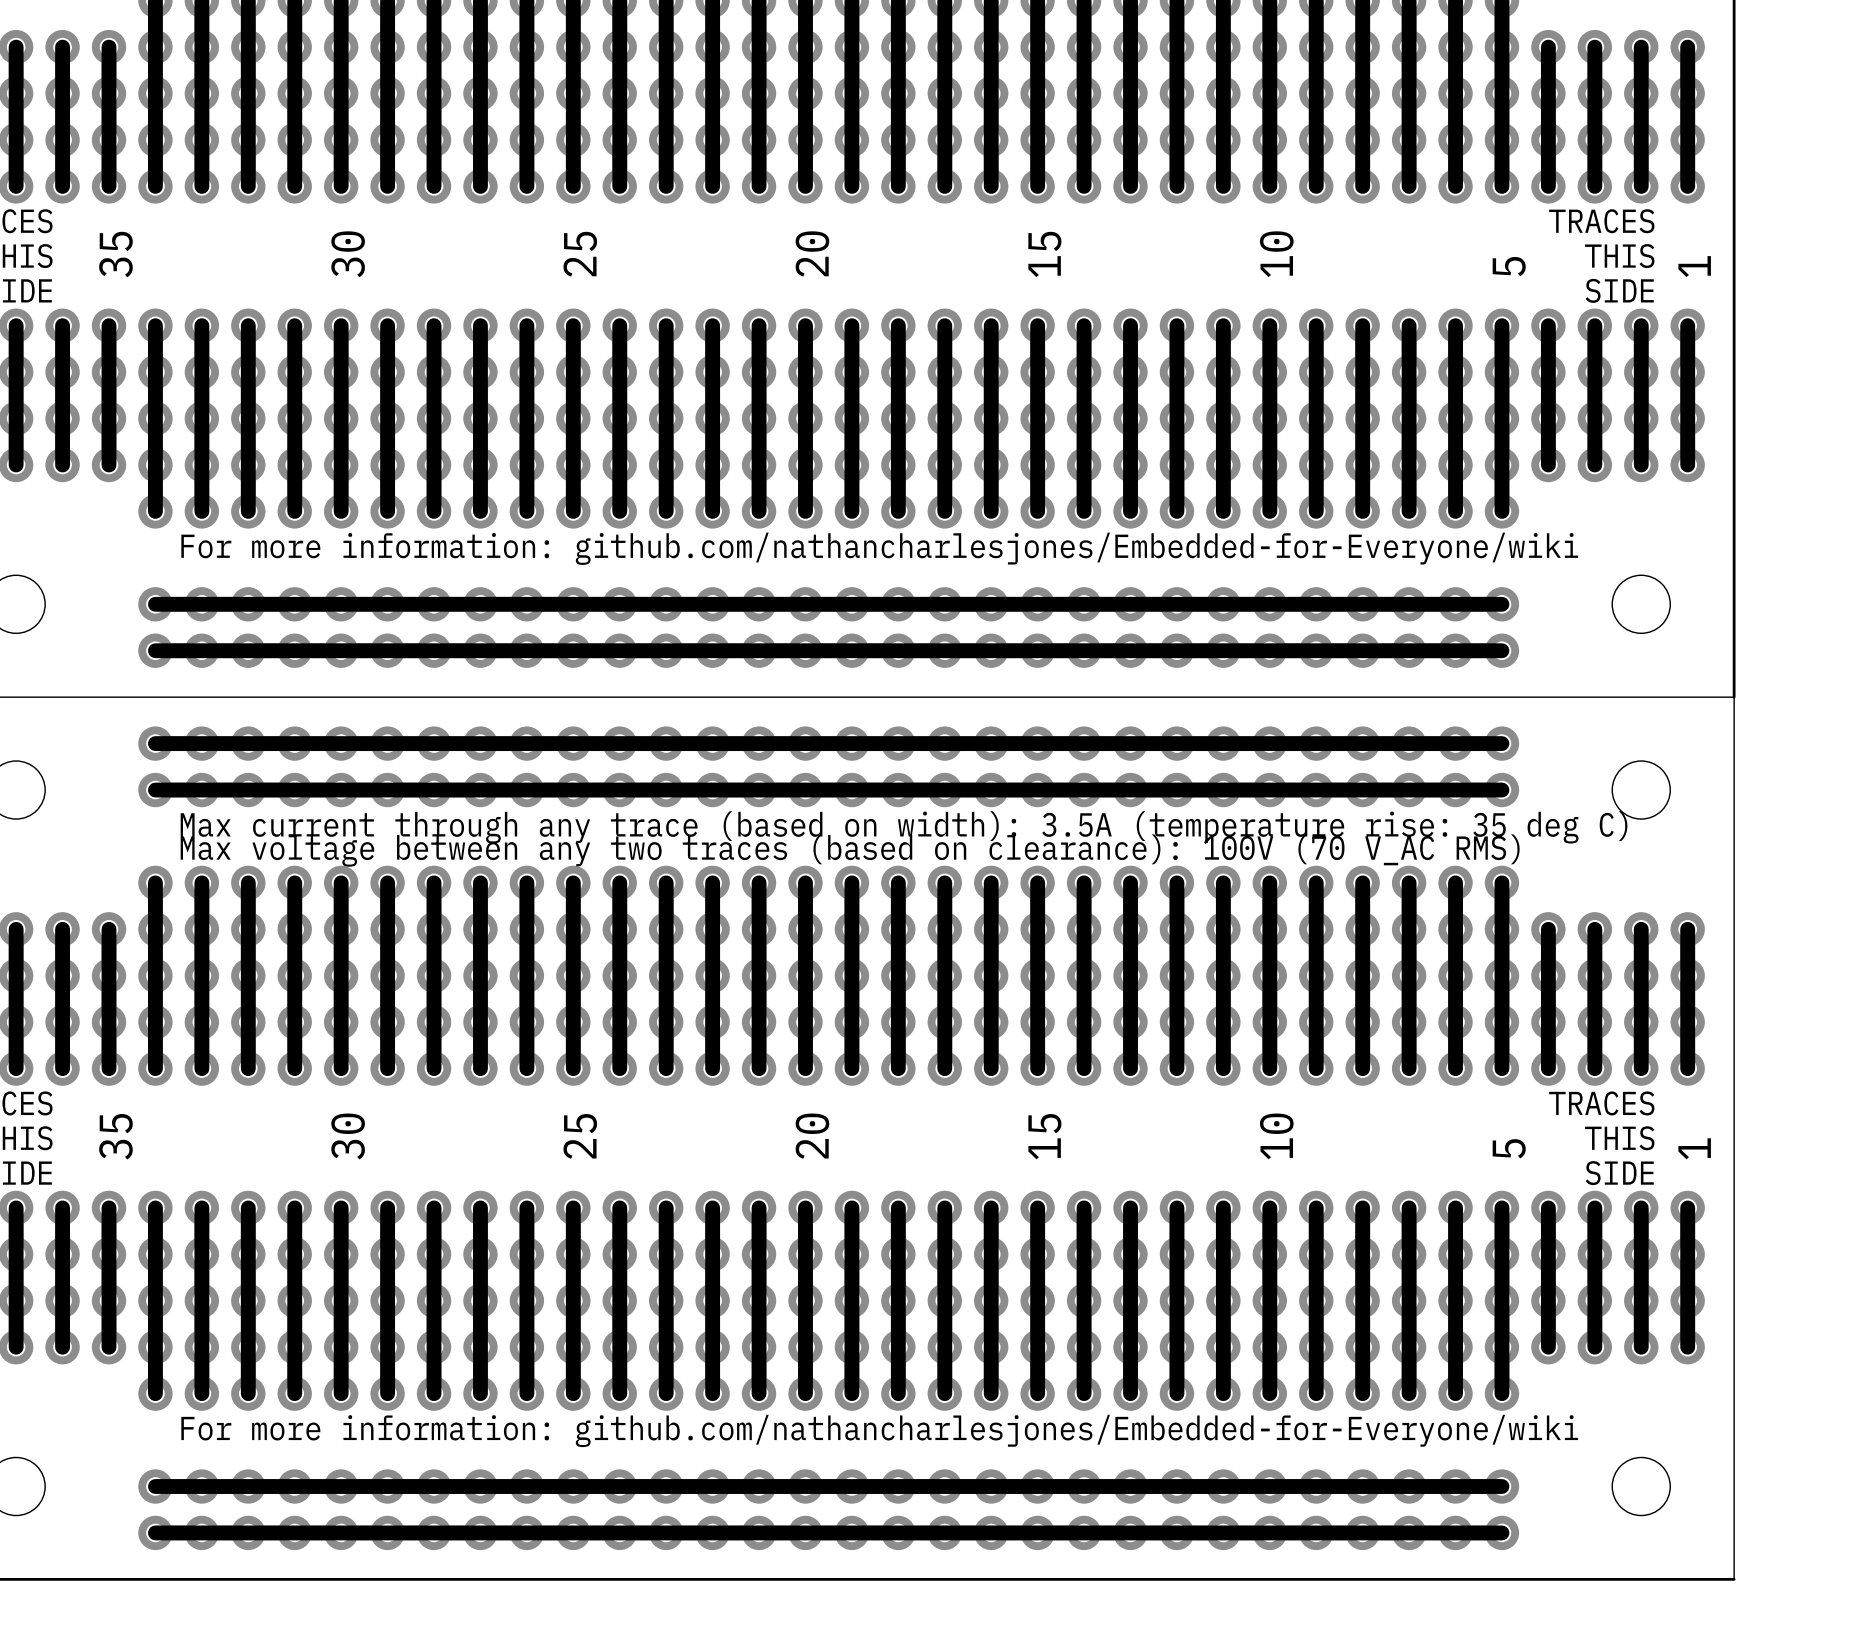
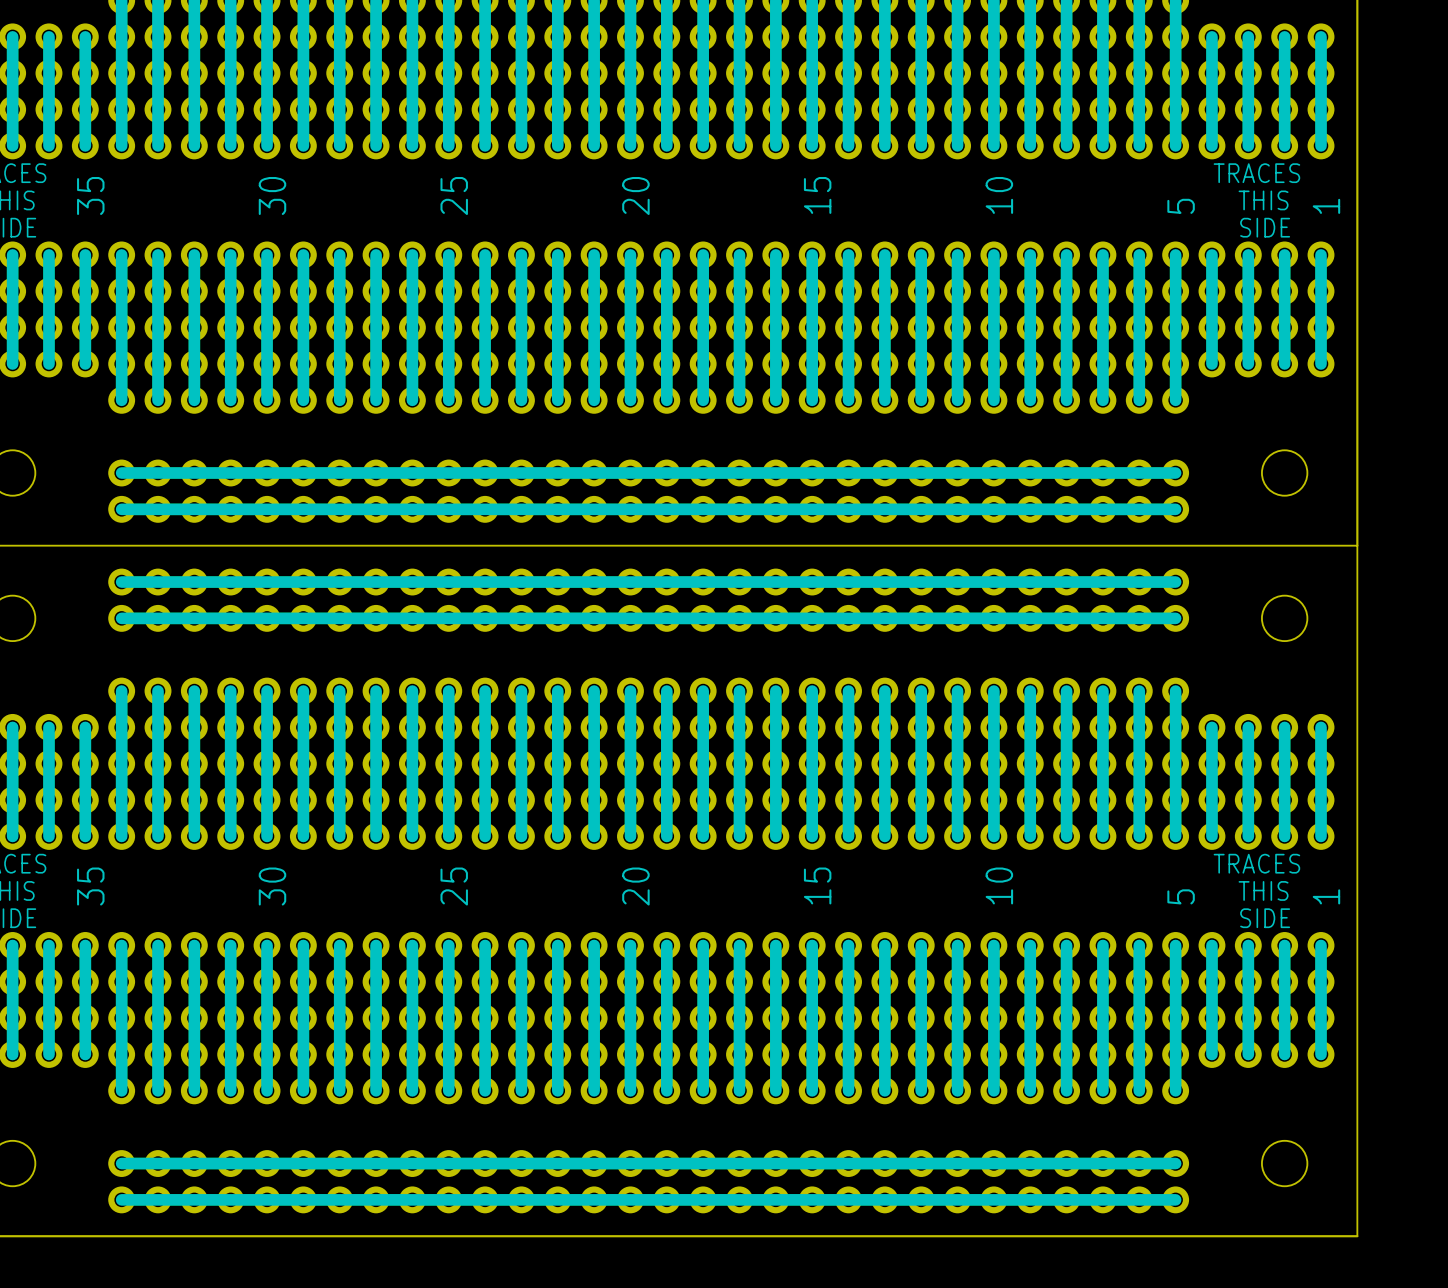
text: For more information: github.com/nathancharlesjones/Embedded-for-Everyone/wiki (879, 548) -> none
text: Max current through any trace (based on width): 3.5A (temperature rise: 35 deg C) (904, 827) -> none
text: Max voltage between any two traces (based on clearance): 100V (70 V_AC RMS) (850, 850) -> none
text: For more information: github.com/nathancharlesjones/Embedded-for-Everyone/wiki (879, 1430) -> none

